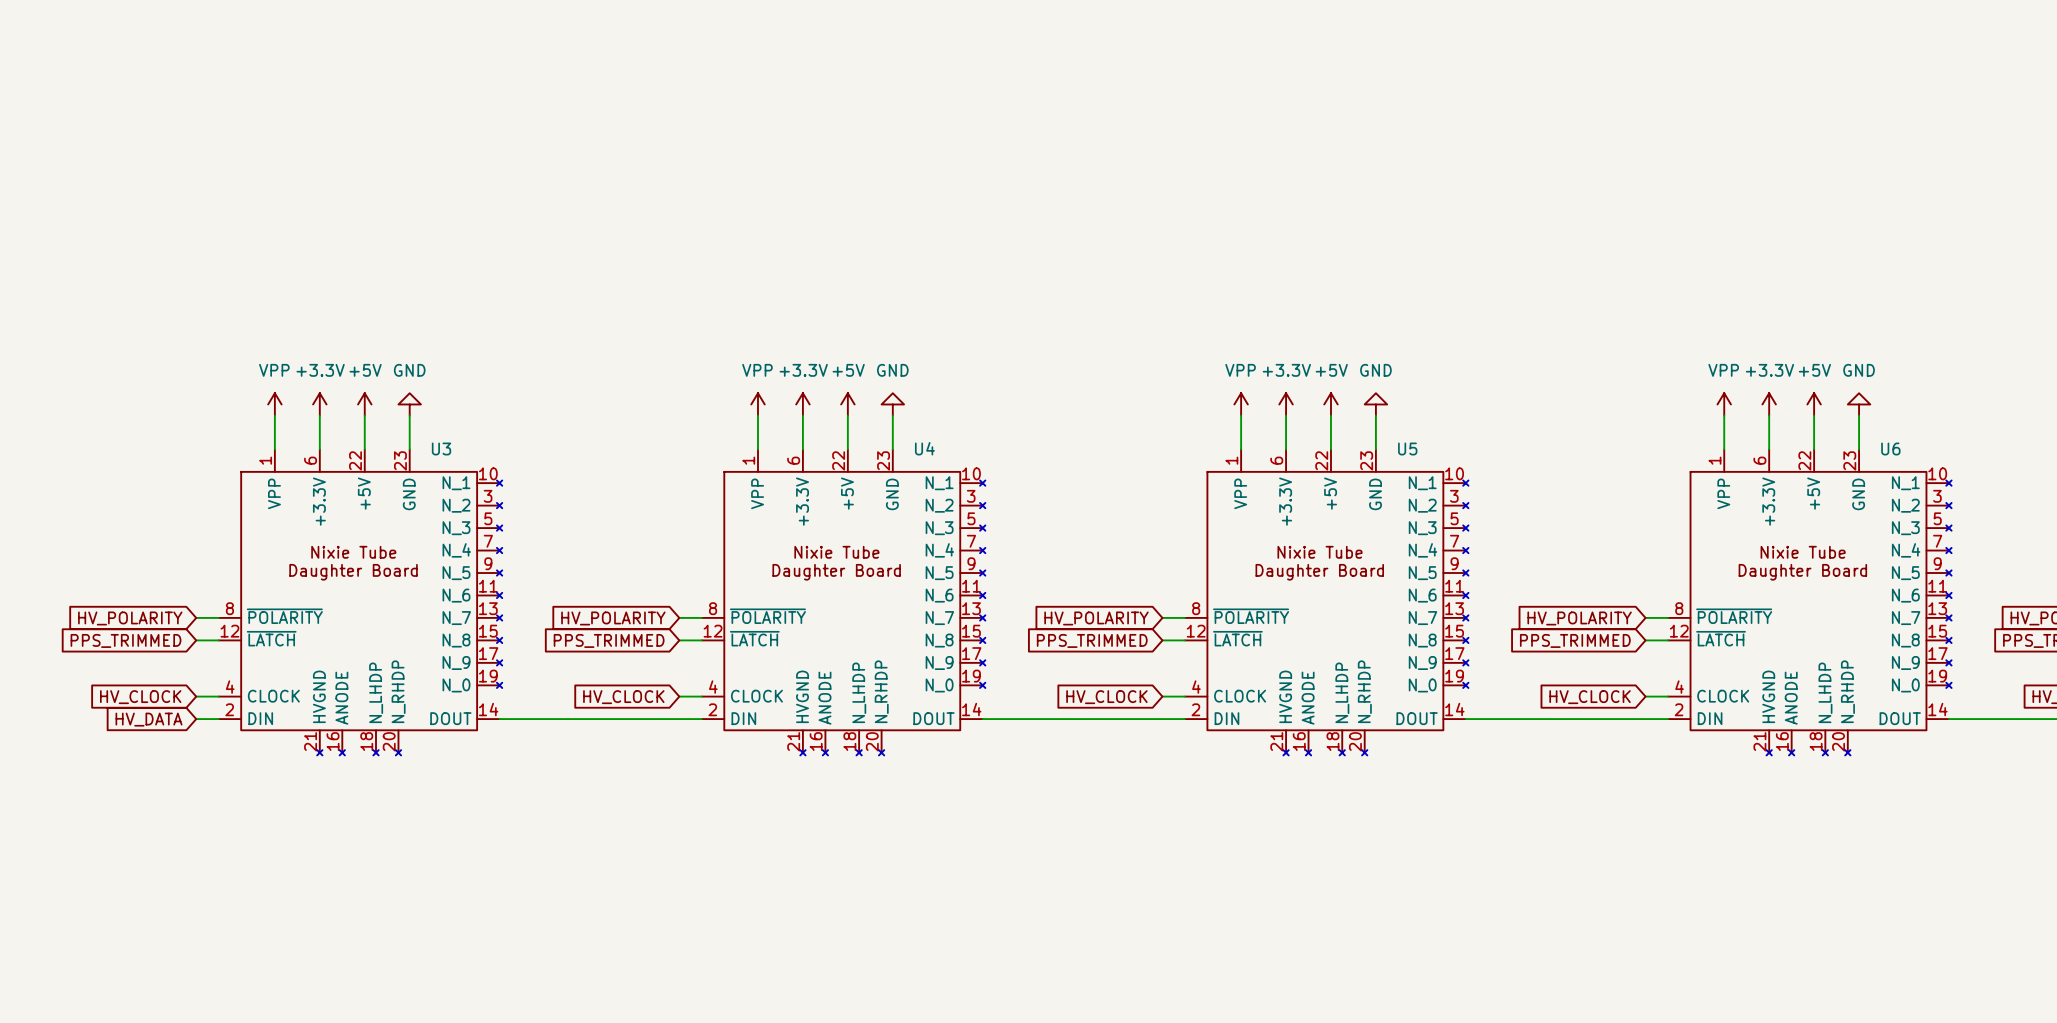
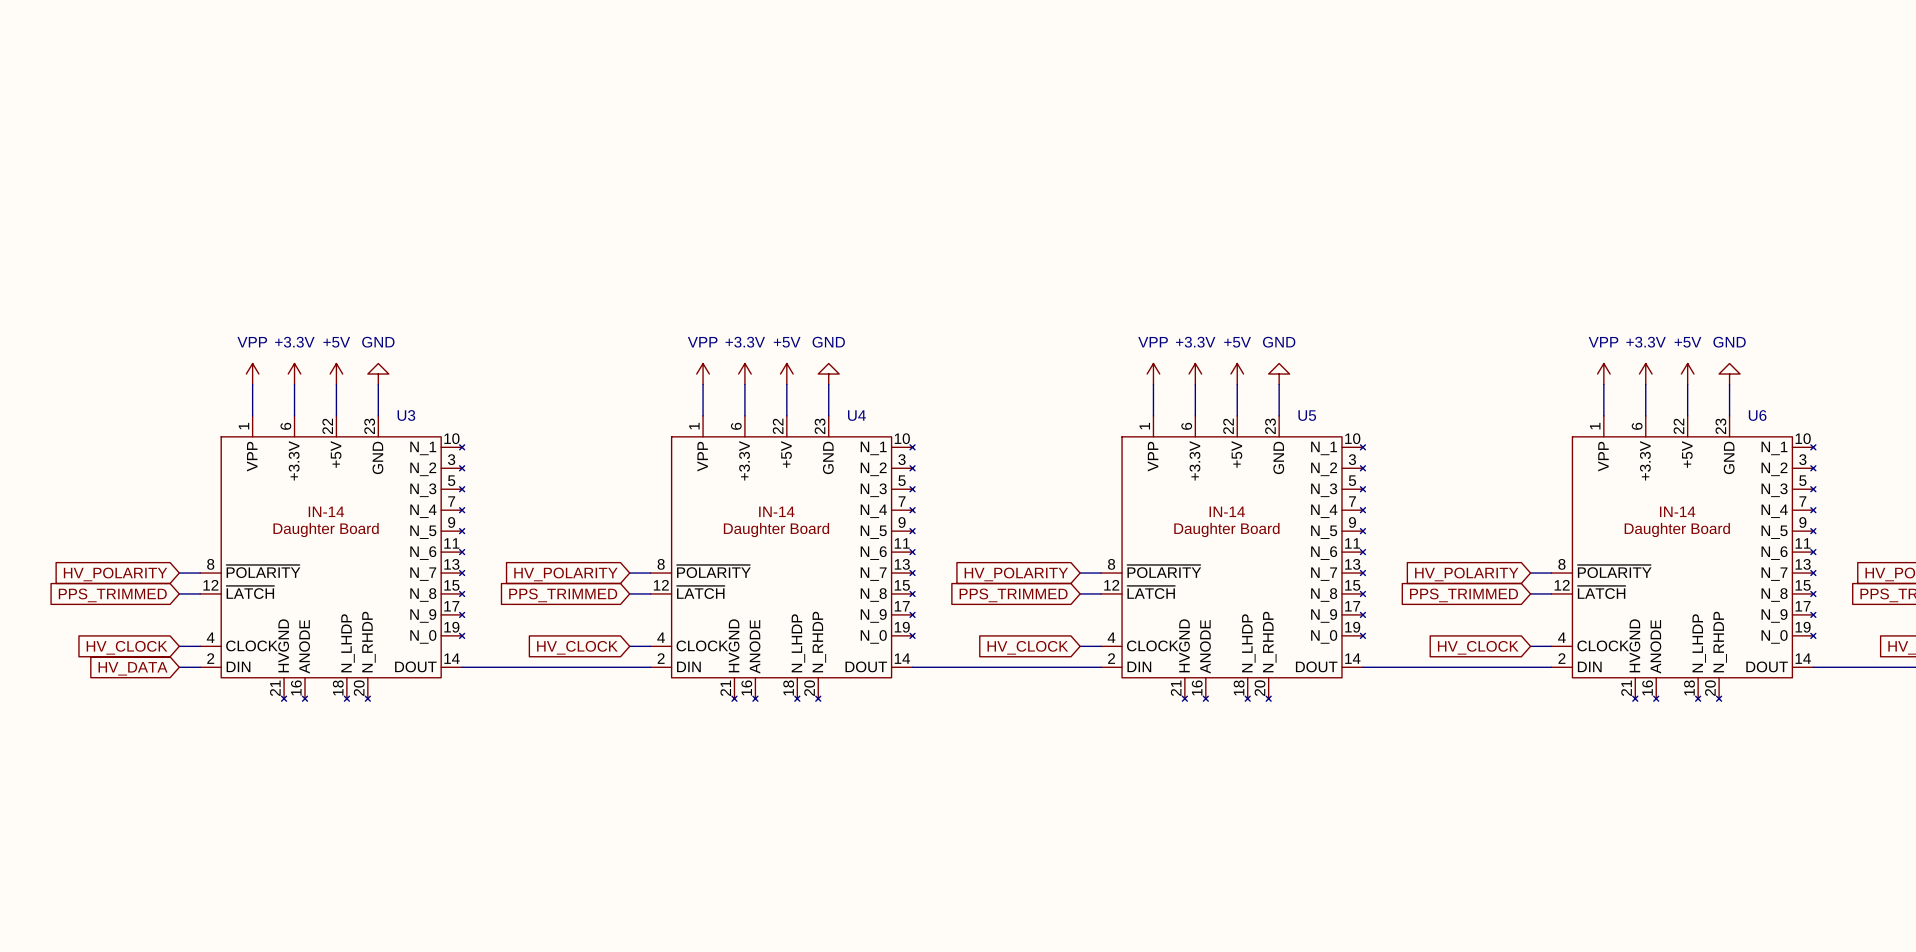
U3 symbol: [218, 449, 503, 756] -> [200, 415, 465, 702]
U4 symbol: [701, 449, 986, 756] -> [650, 415, 916, 702]
U5 symbol: [1184, 449, 1469, 756] -> [1101, 415, 1366, 702]
U6 symbol: [1668, 449, 1952, 756] -> [1551, 415, 1816, 702]

